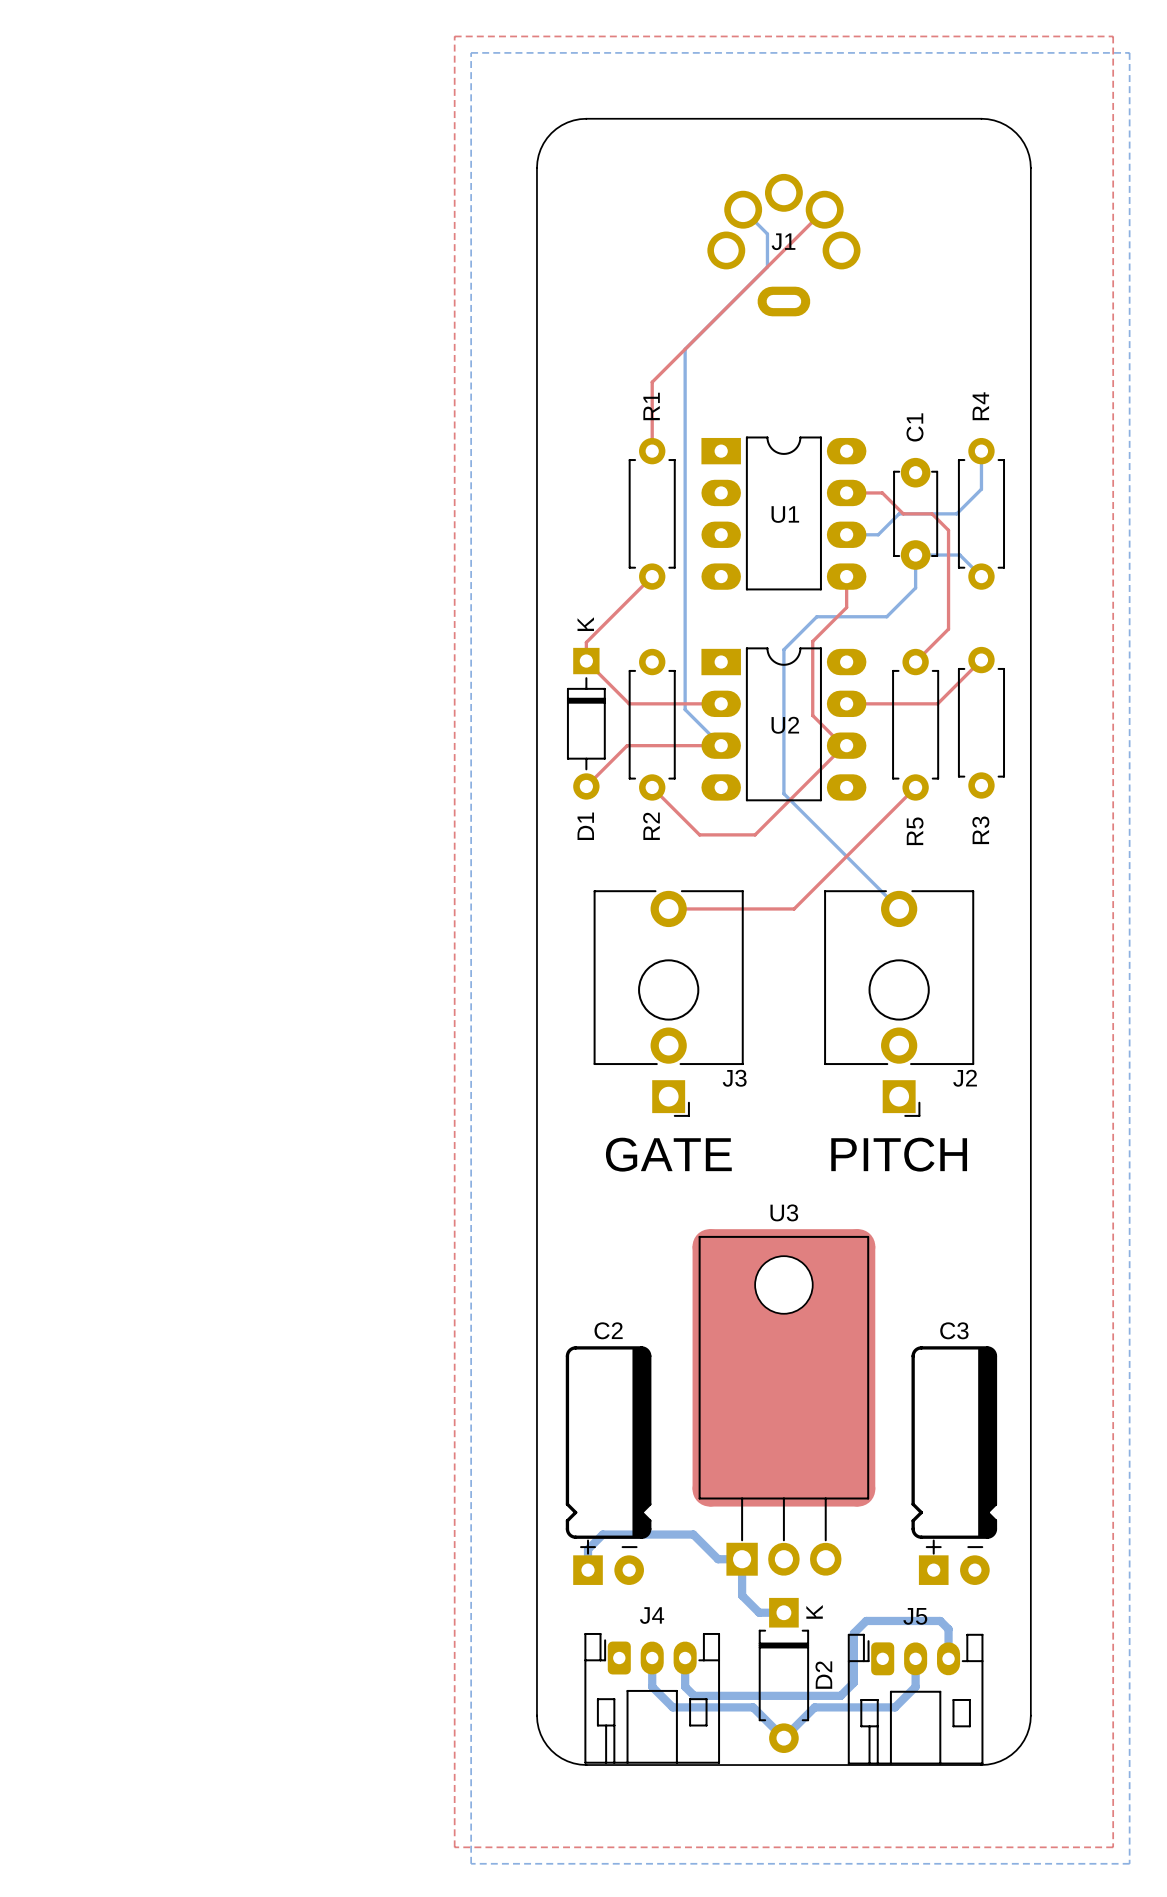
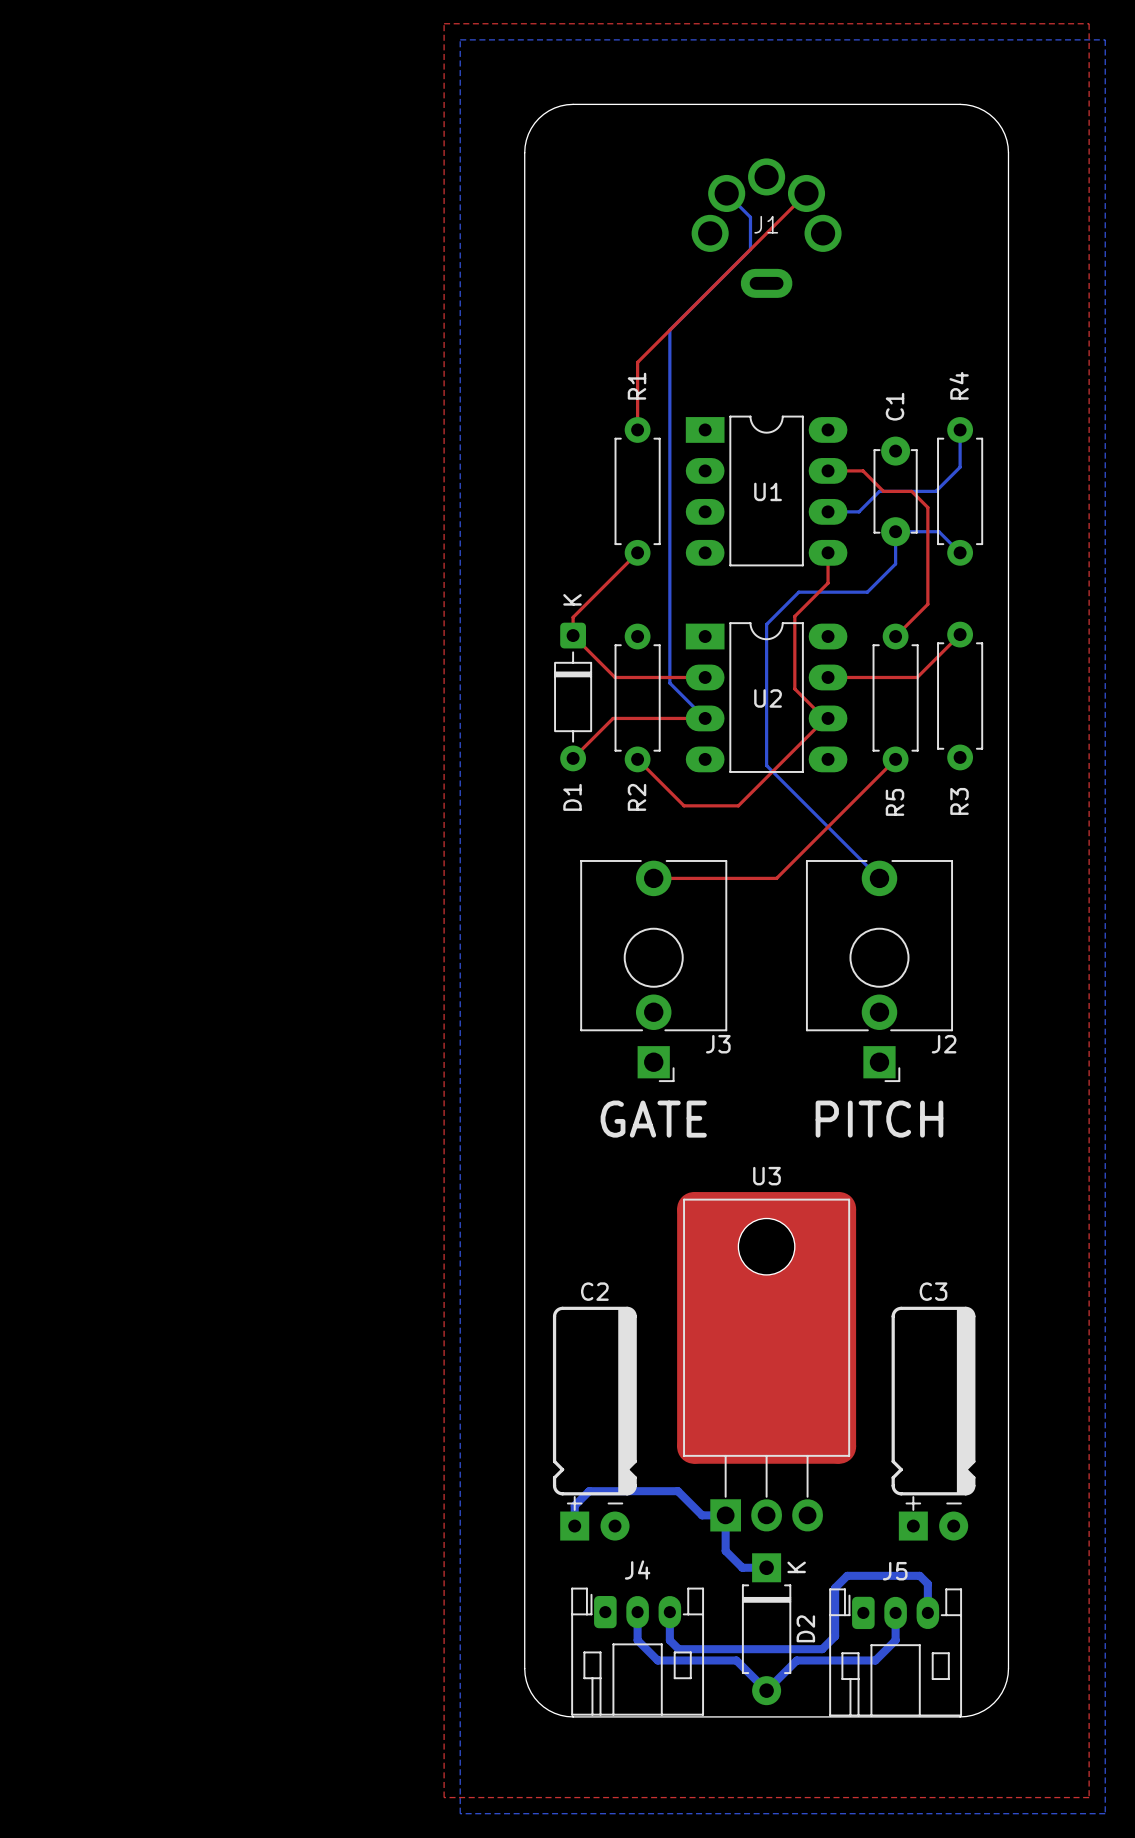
D1 footprint: [566, 647, 606, 800] -> [554, 622, 593, 772]

